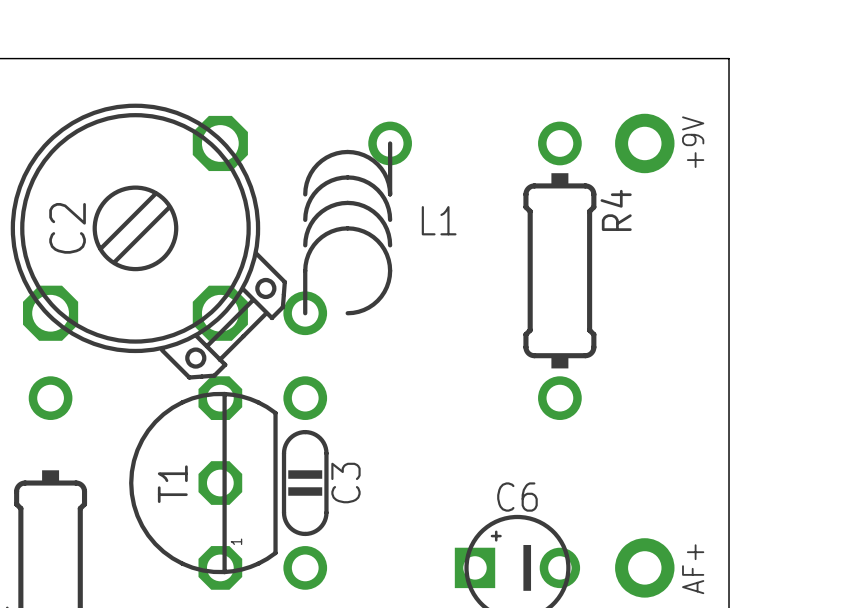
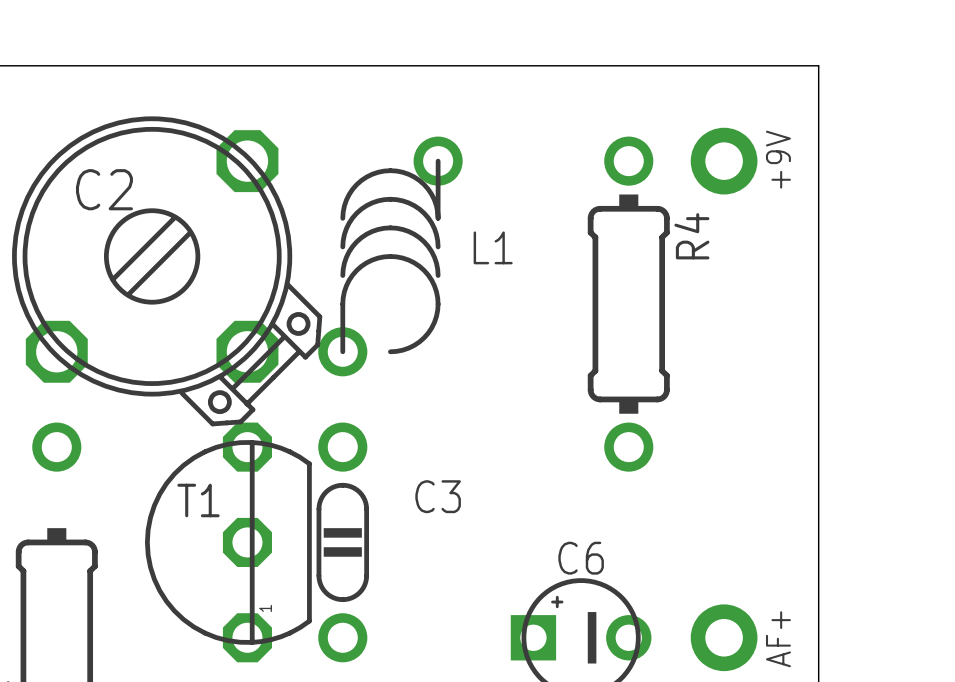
C2 name rotation: 0° (67, 228) -> 90° clockwise (104, 189)
C3 name rotation: 0° (345, 483) -> 90° clockwise (438, 496)
T1 name rotation: 0° (172, 484) -> 90° clockwise (198, 500)

